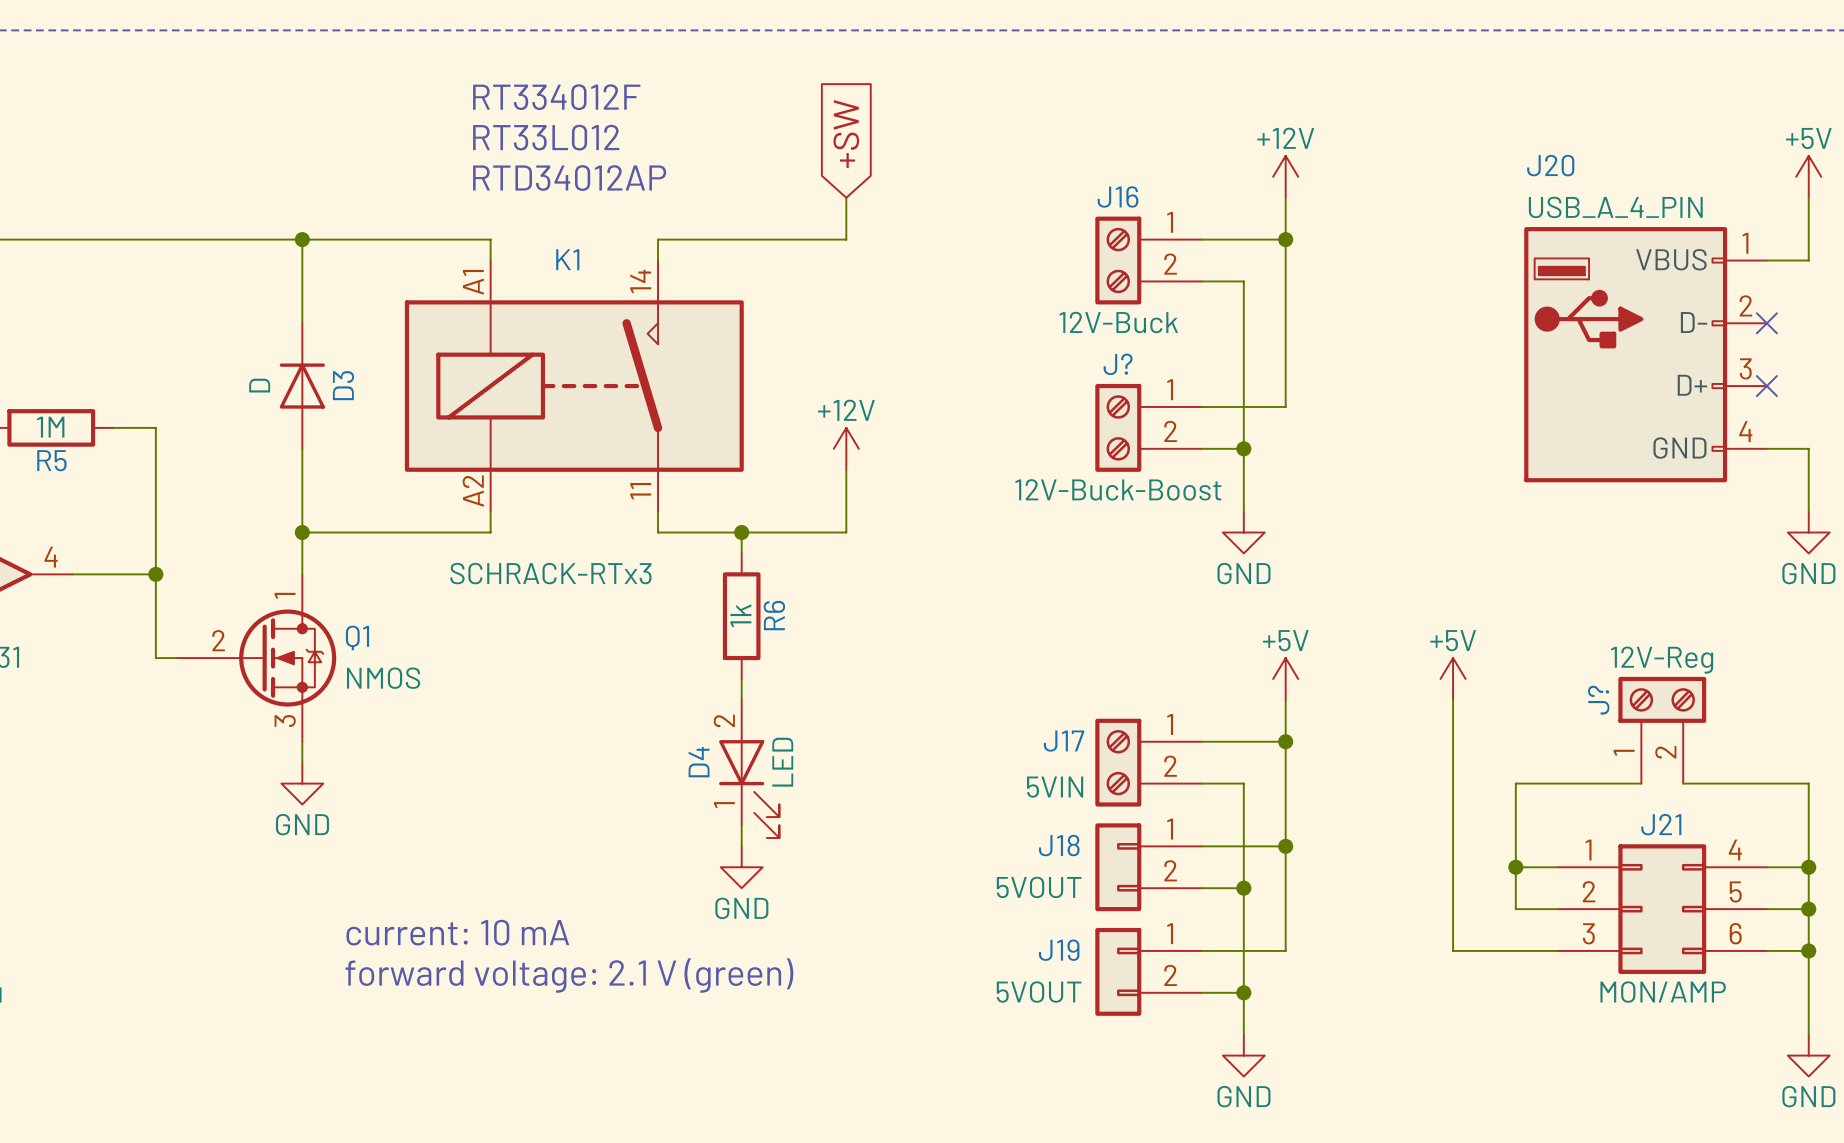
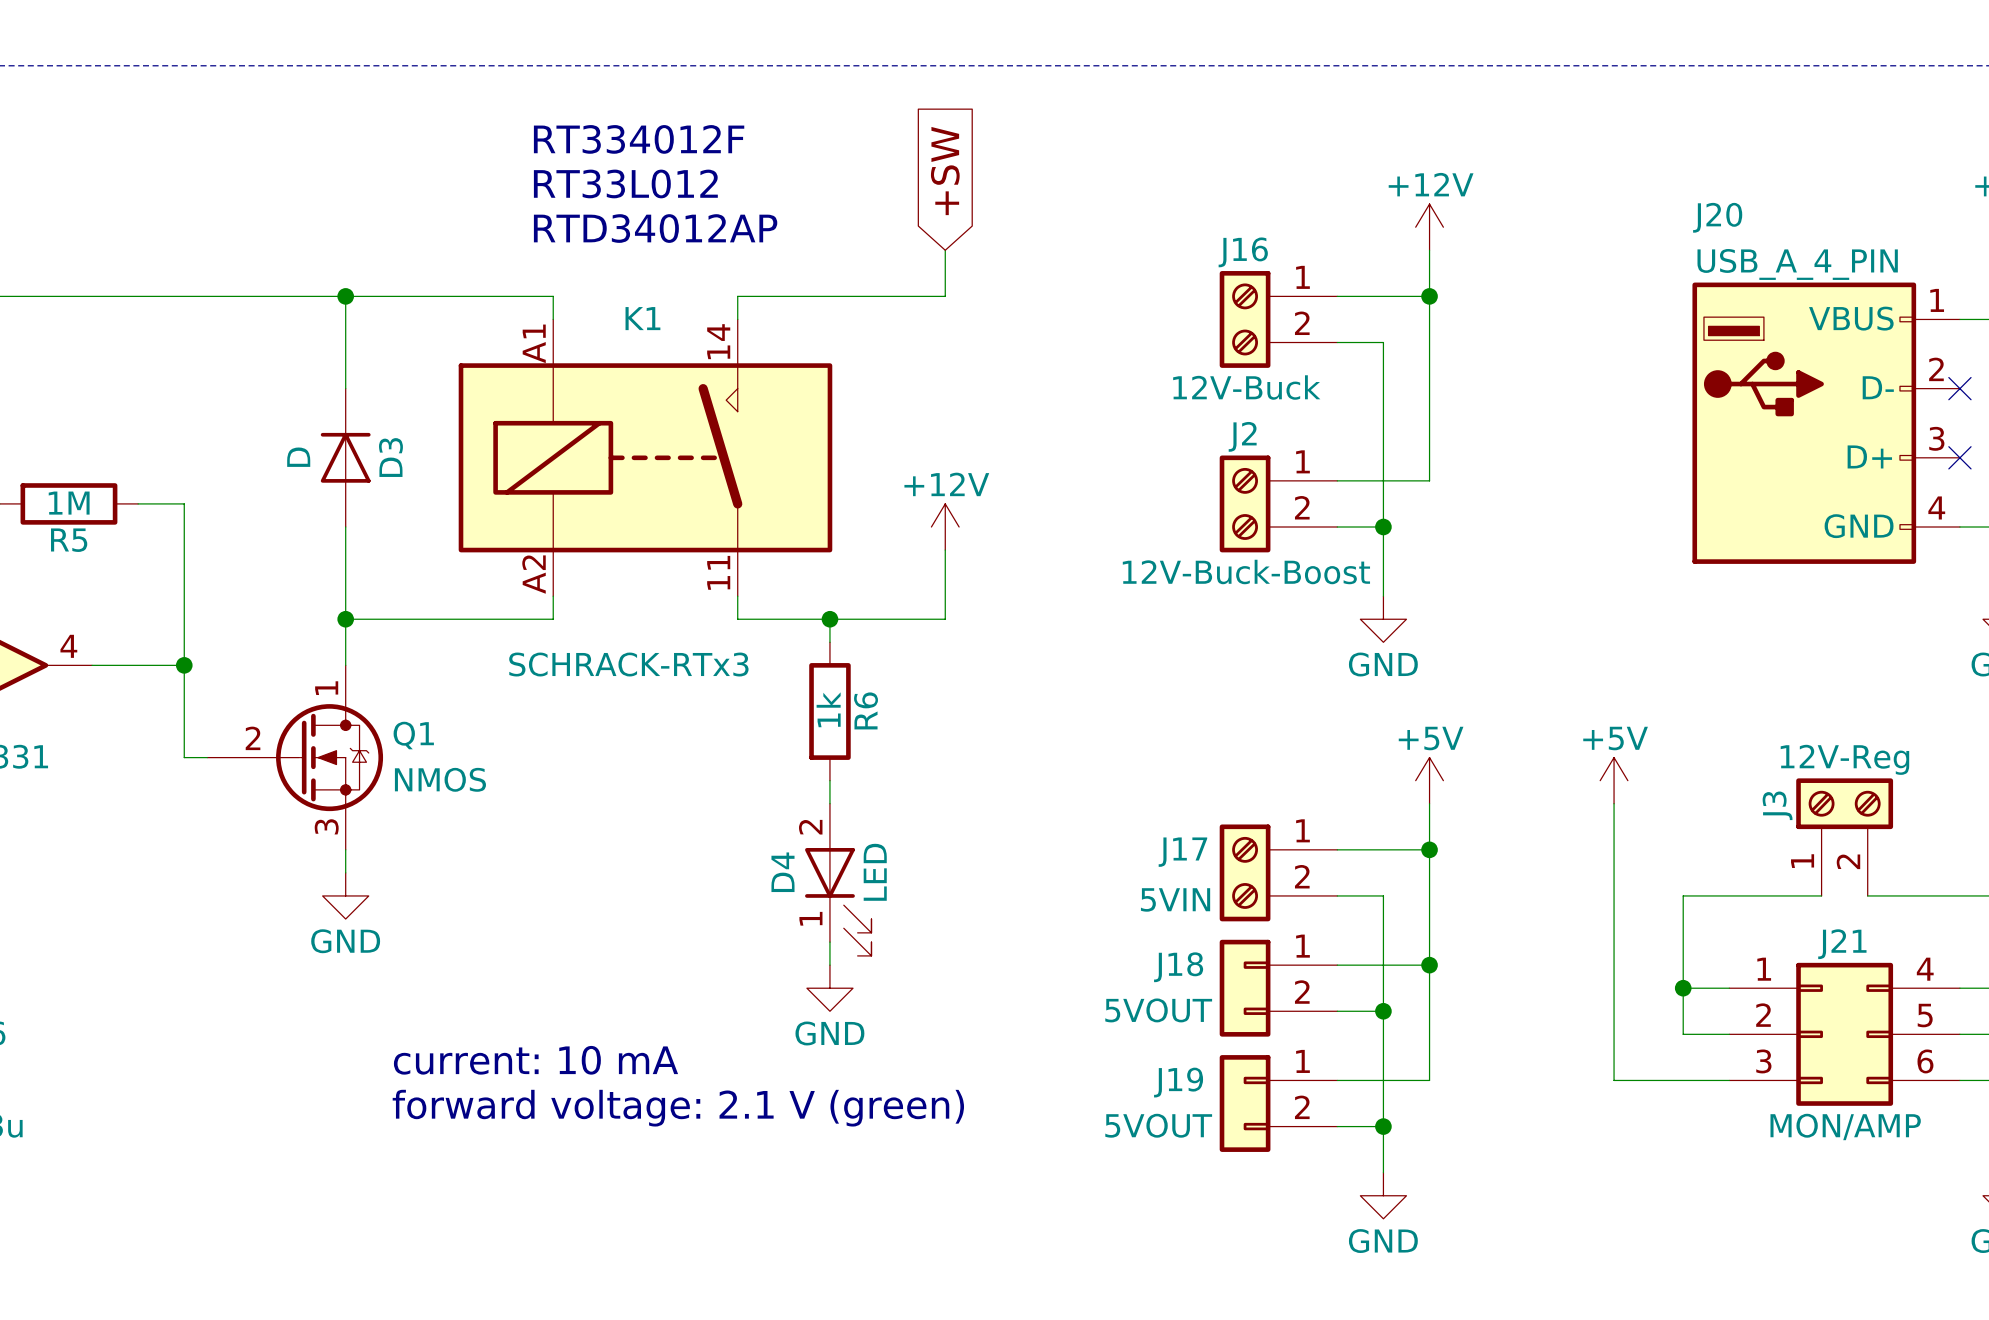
J? name: J? (1118, 364) -> J2 (1242, 436)
J? name: J? (1598, 700) -> J3 (1777, 805)

